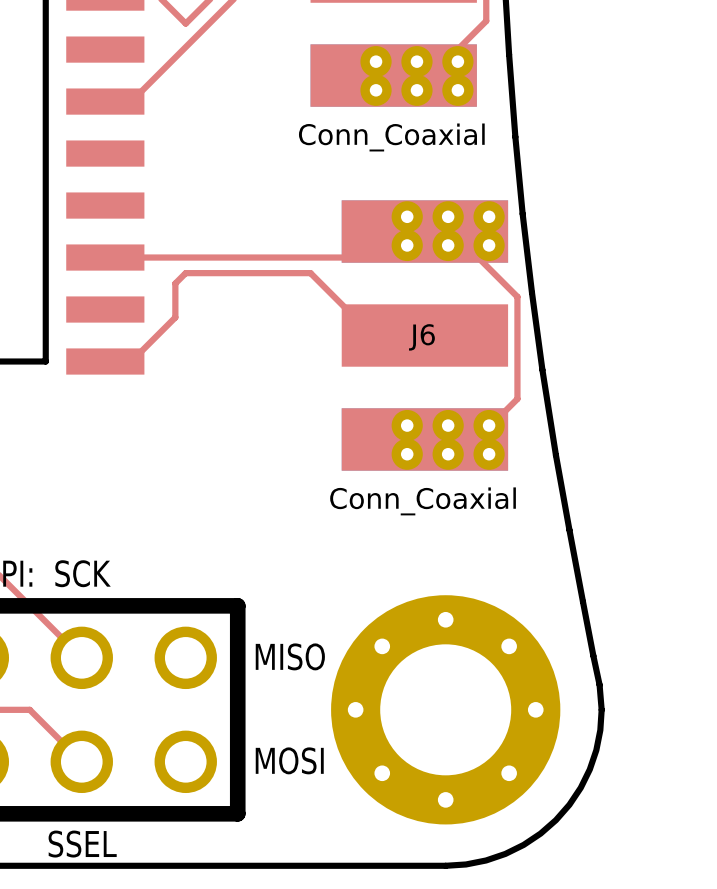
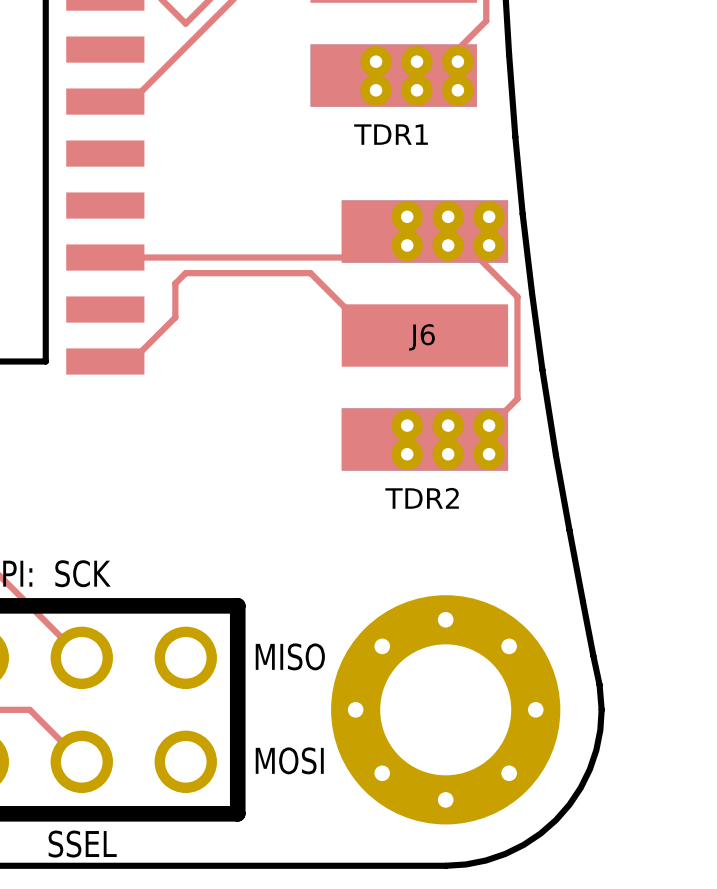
part value: Conn_Coaxial (391, 137) -> TDR1 (391, 134)
J6 value: Conn_Coaxial (423, 501) -> TDR2 (422, 498)

